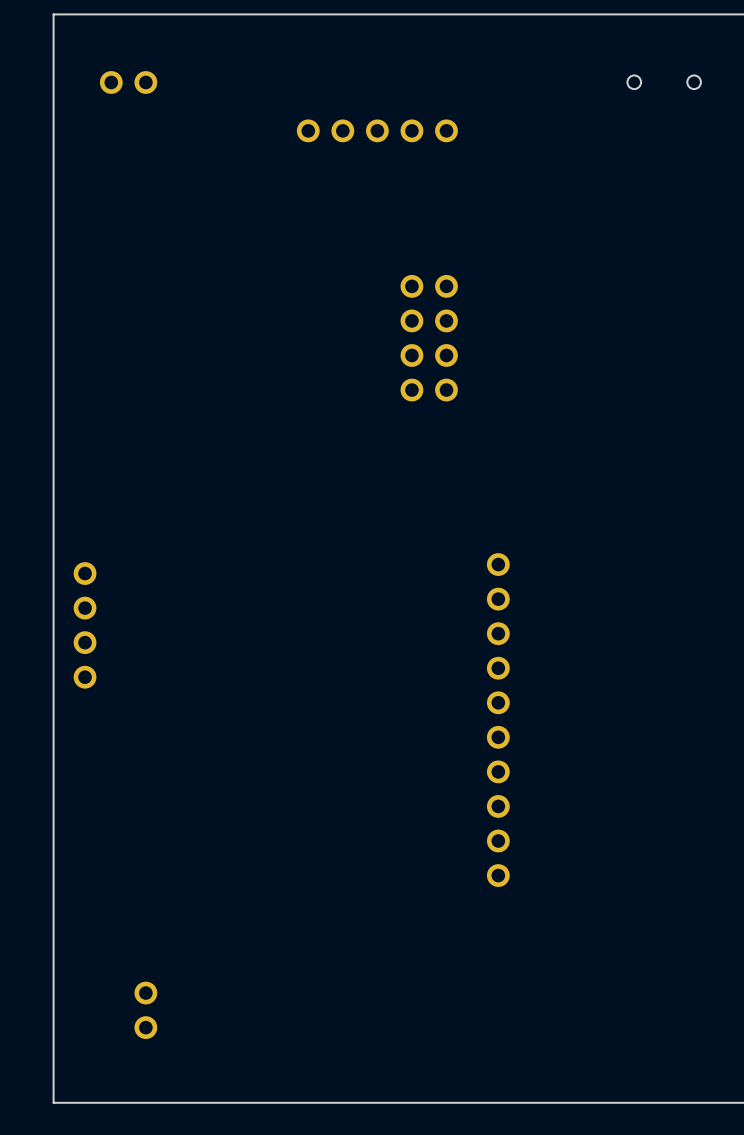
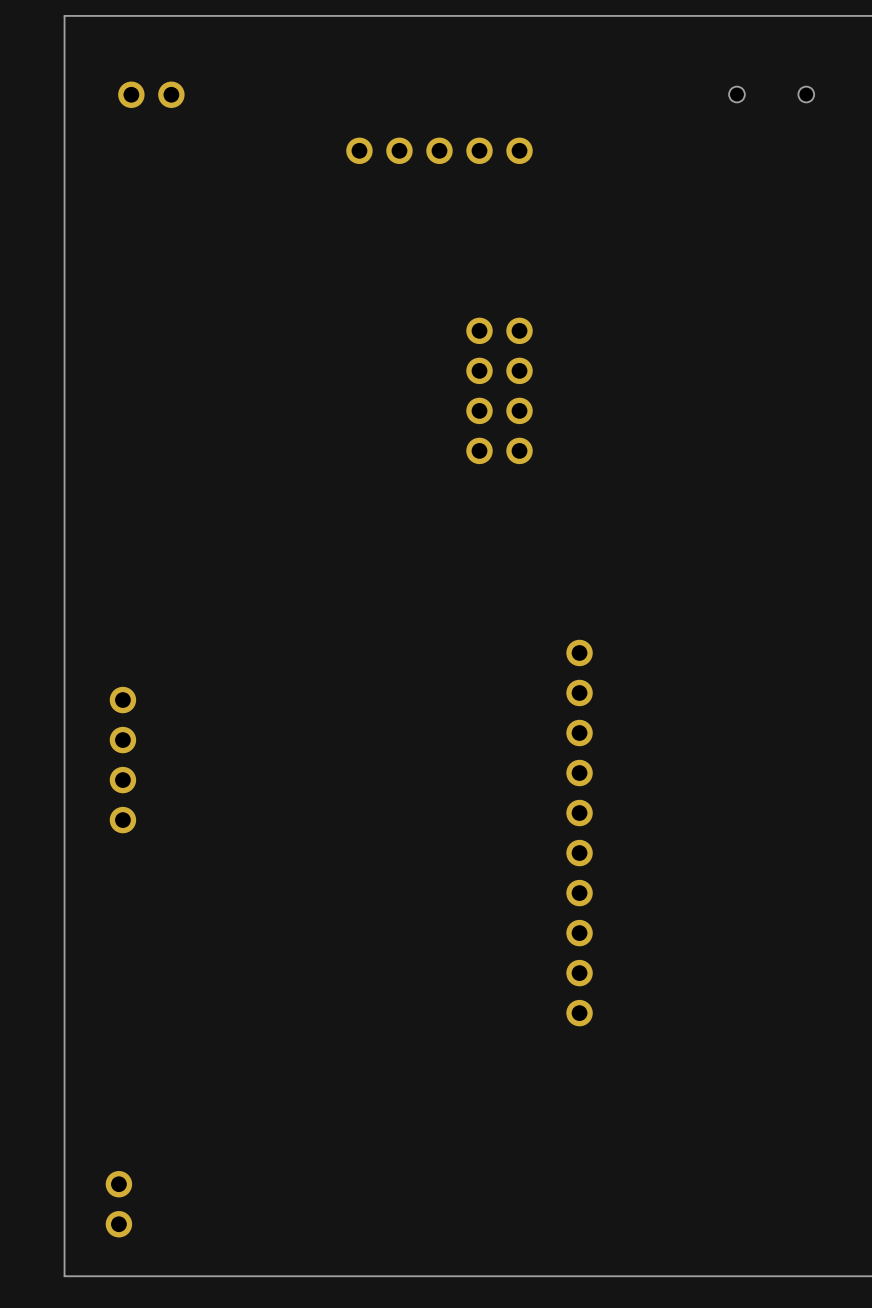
part position: (85, 625) -> (122, 760)
part position: (145, 1010) -> (118, 1204)

